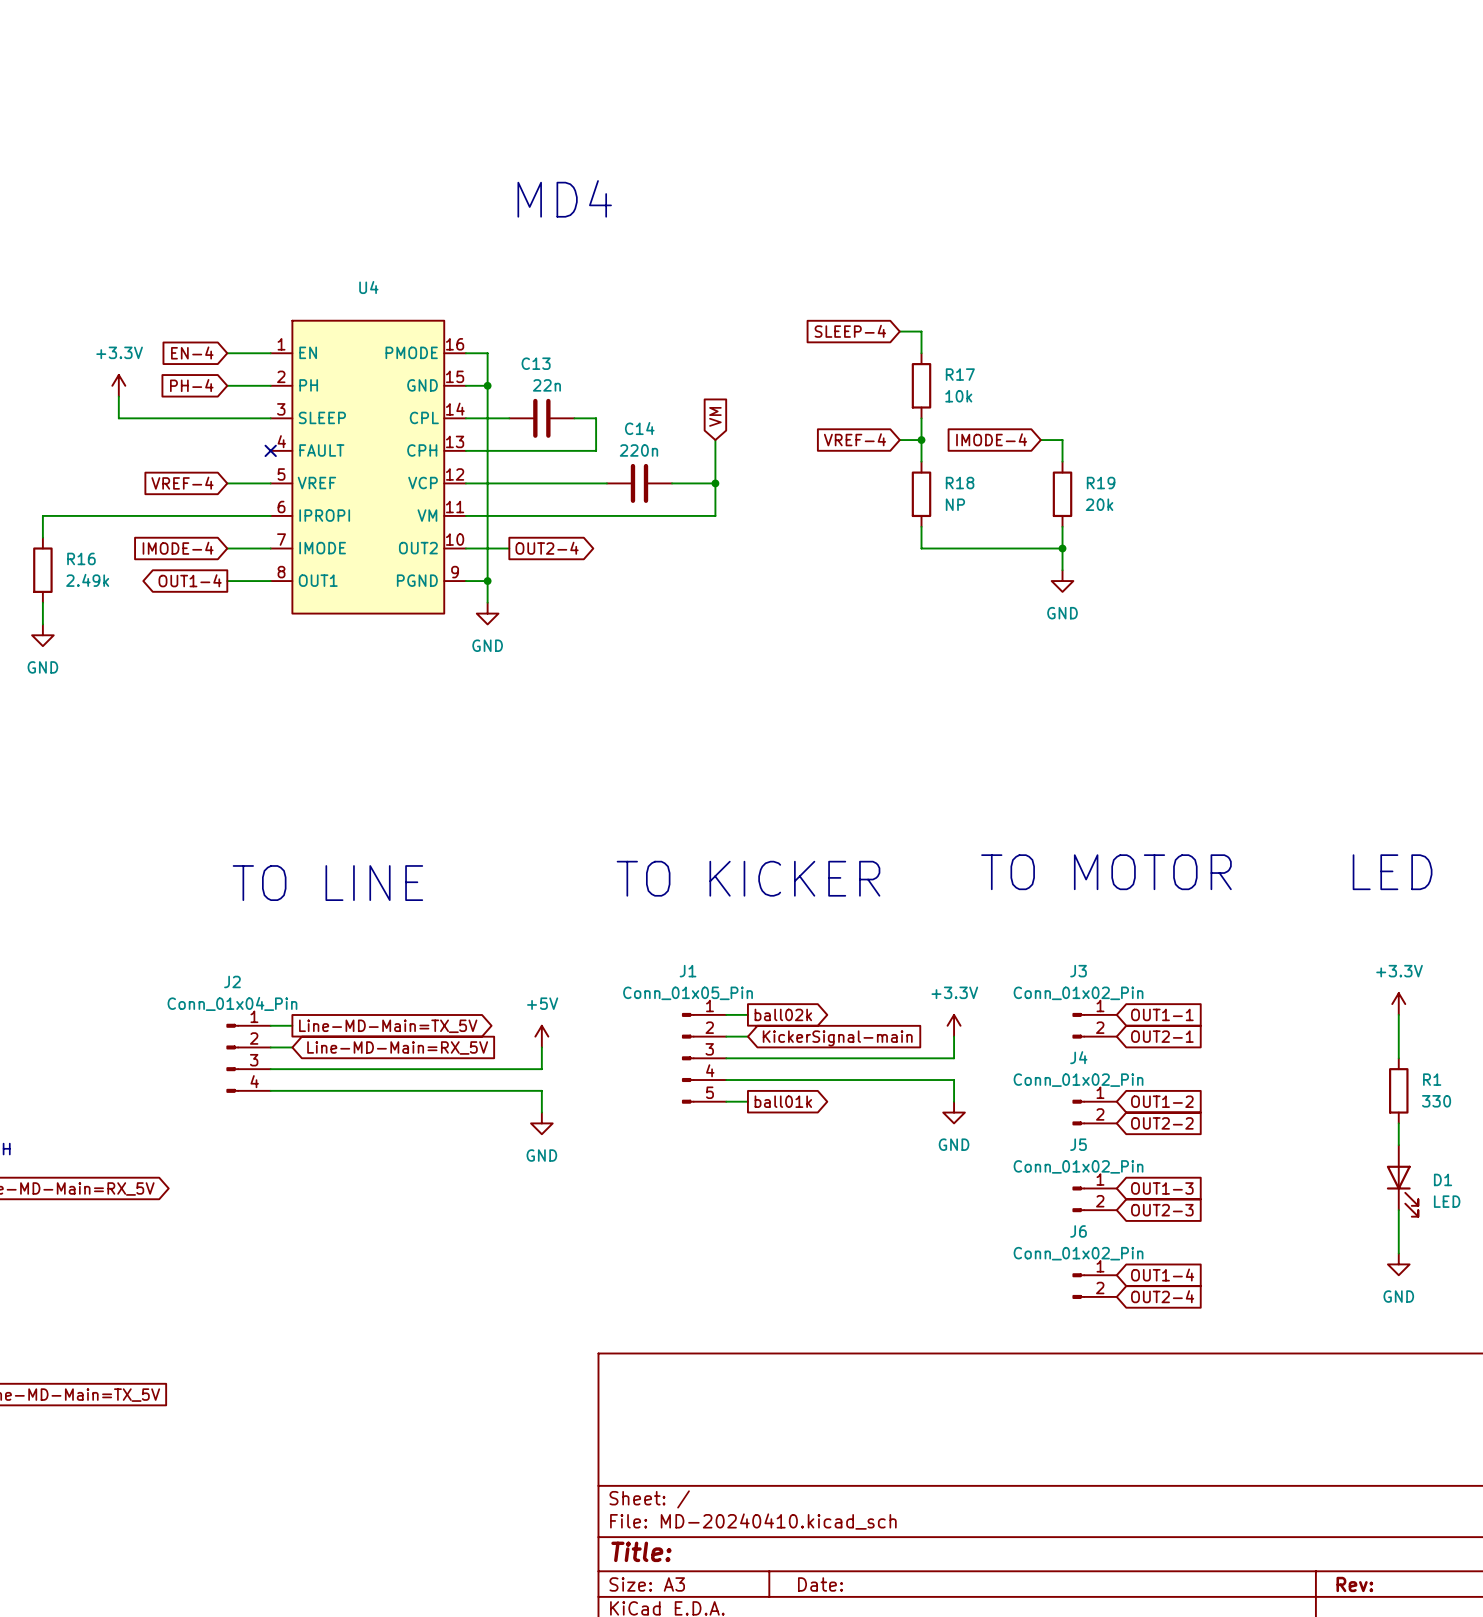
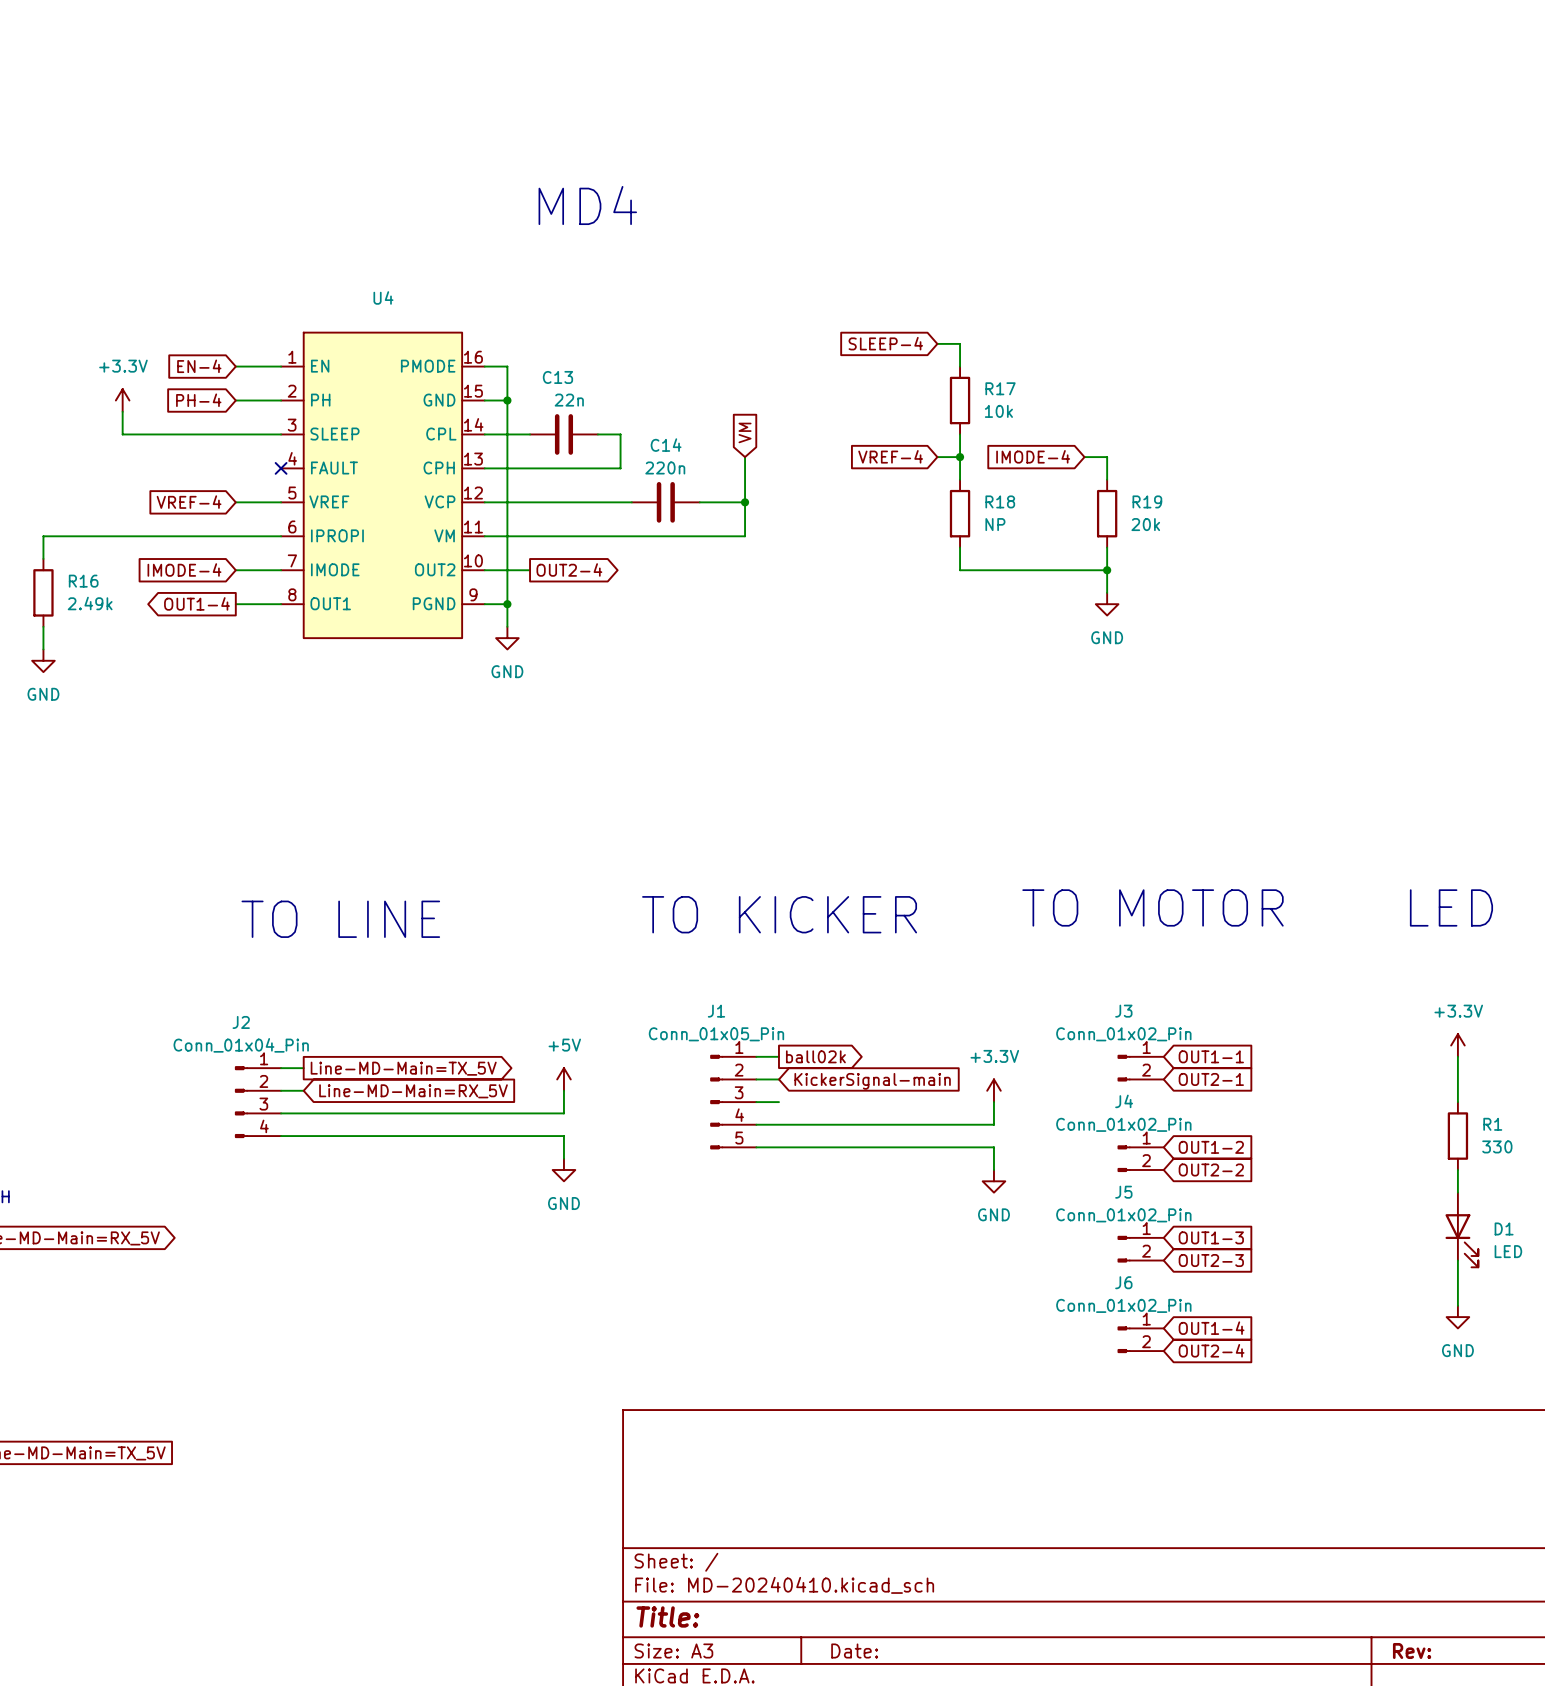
power symbol position: +3.3V (954, 1025) -> +3.3V (993, 1090)
wire: (954, 1036) (954, 1058) (747, 1058) -> none
wire: (954, 1080) (954, 1101) -> (993, 1124) (993, 1102)
wire: none -> (778, 1147) (993, 1147) (993, 1169)
global label: ball01k (783, 1101) -> none
power symbol position: GND (954, 1112) -> GND (993, 1181)

